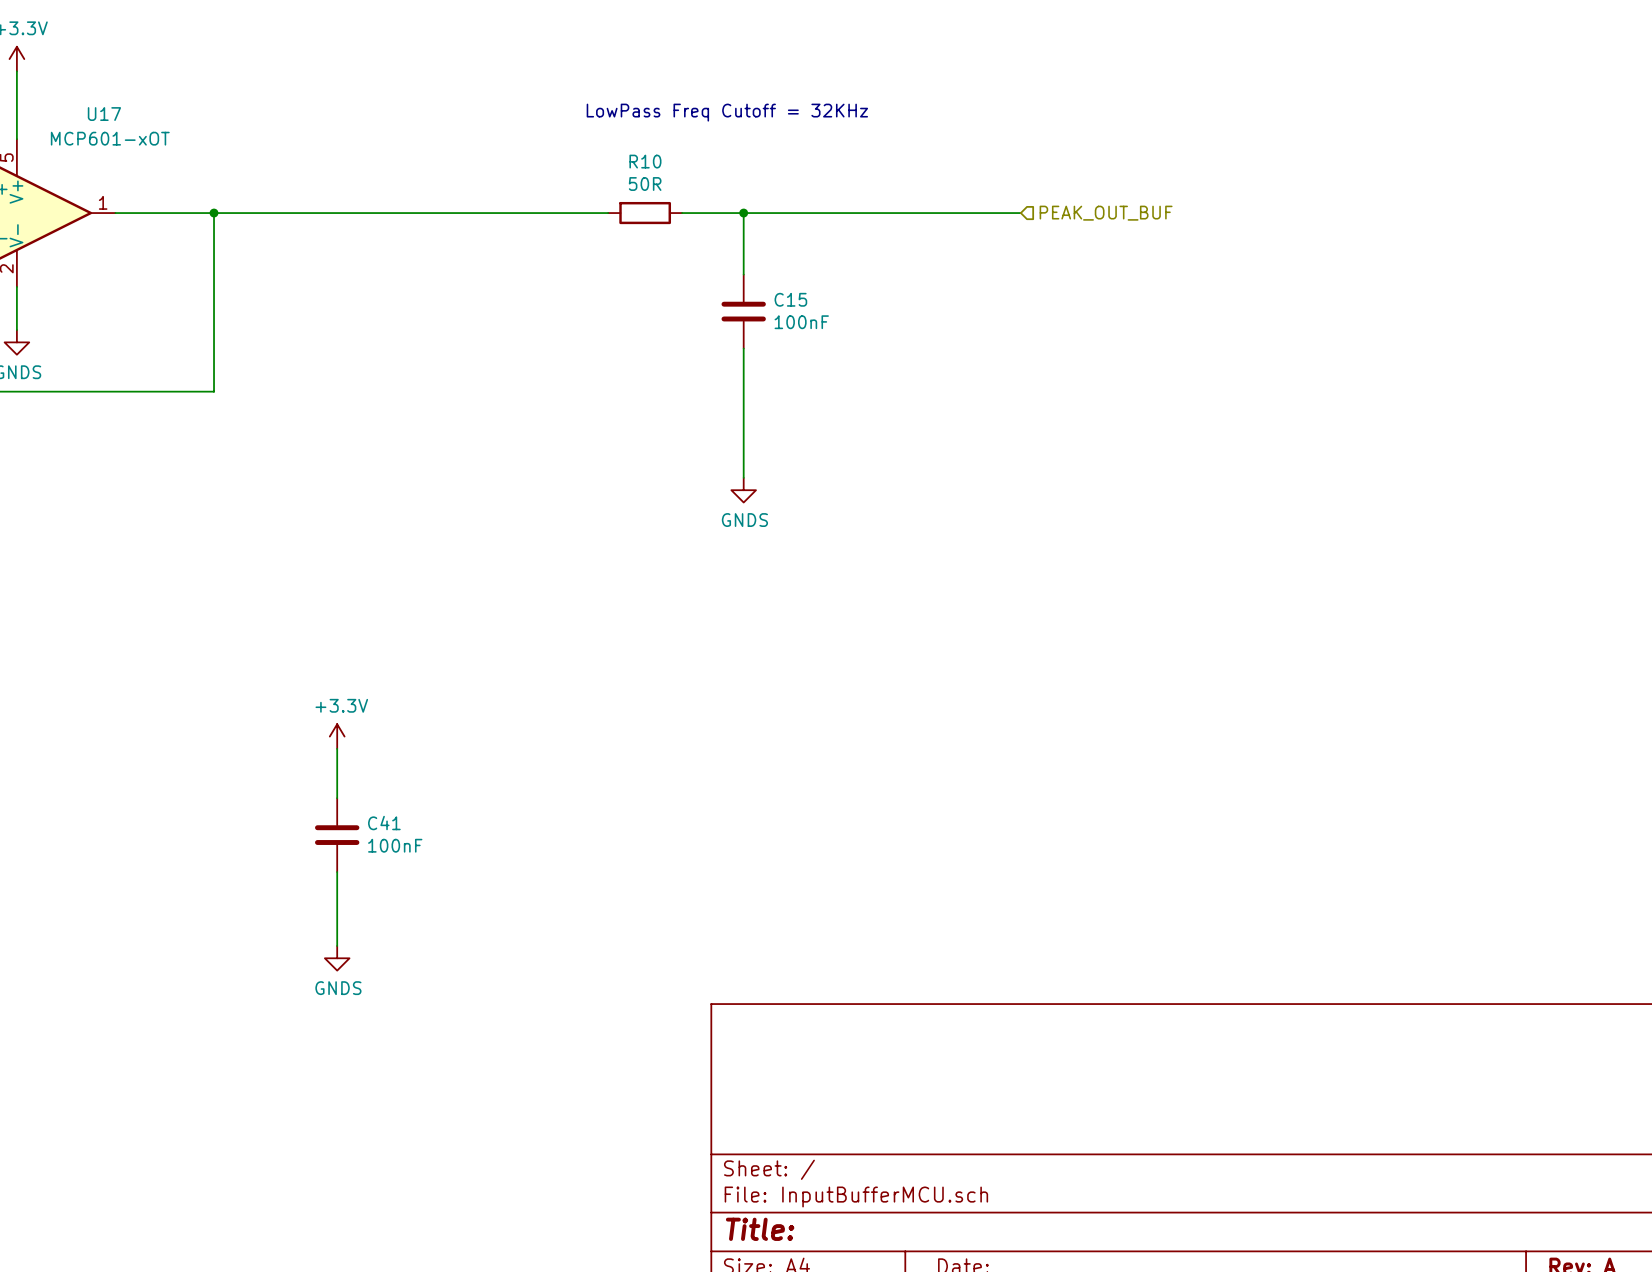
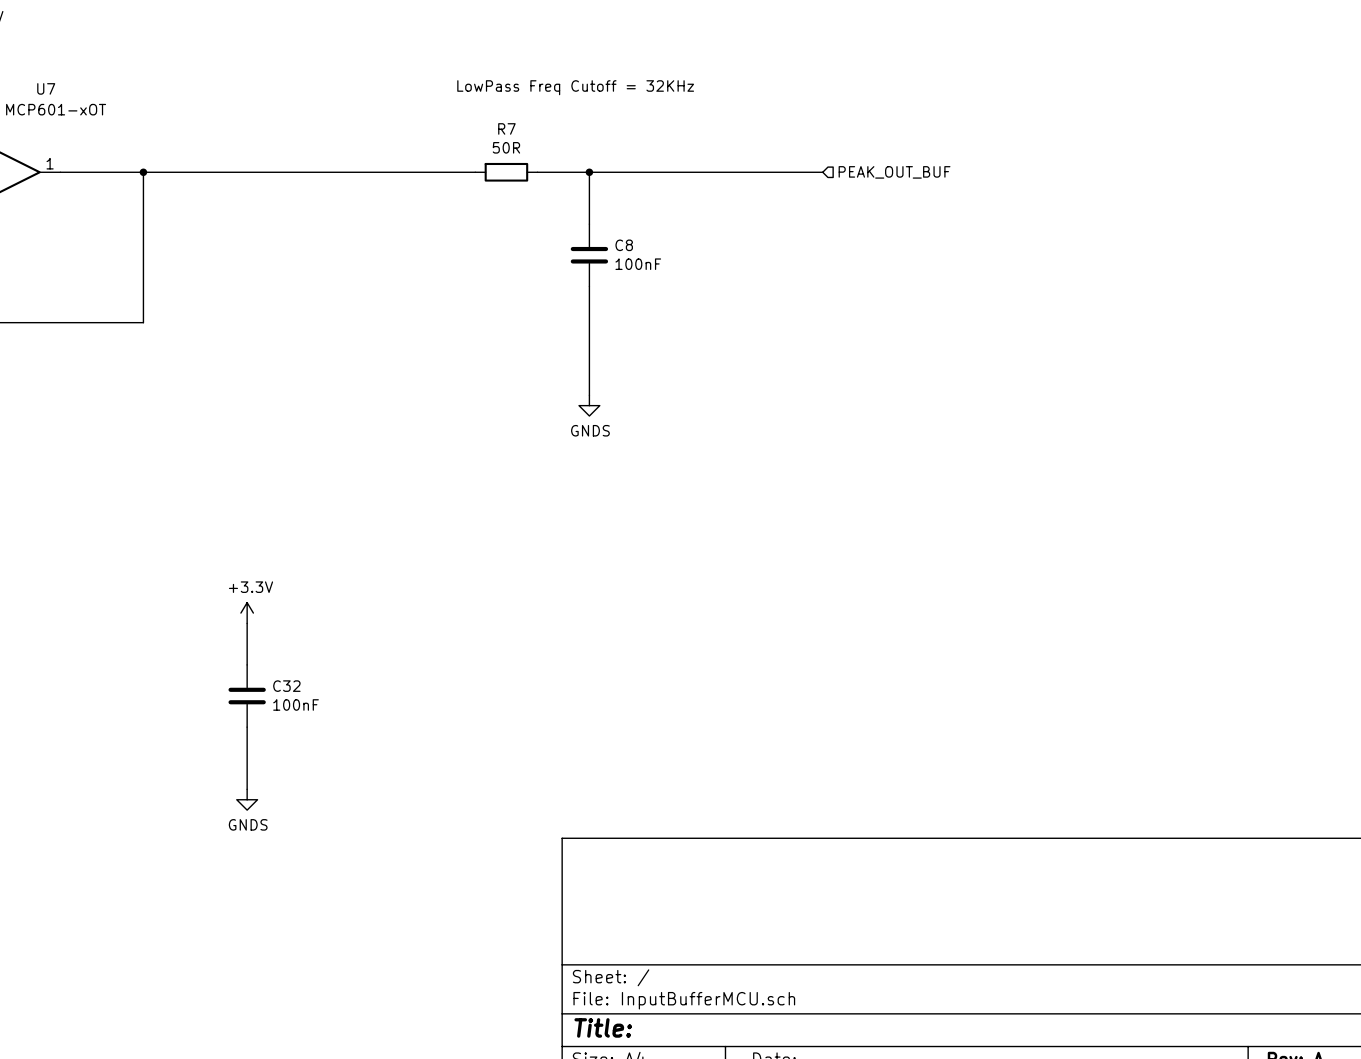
U17 name: U17 (104, 114) -> U7 (46, 88)
R10 name: R10 (645, 161) -> R7 (506, 128)
C15 name: C15 (790, 299) -> C8 (624, 245)
C41 name: C41 (384, 823) -> C32 (286, 686)

